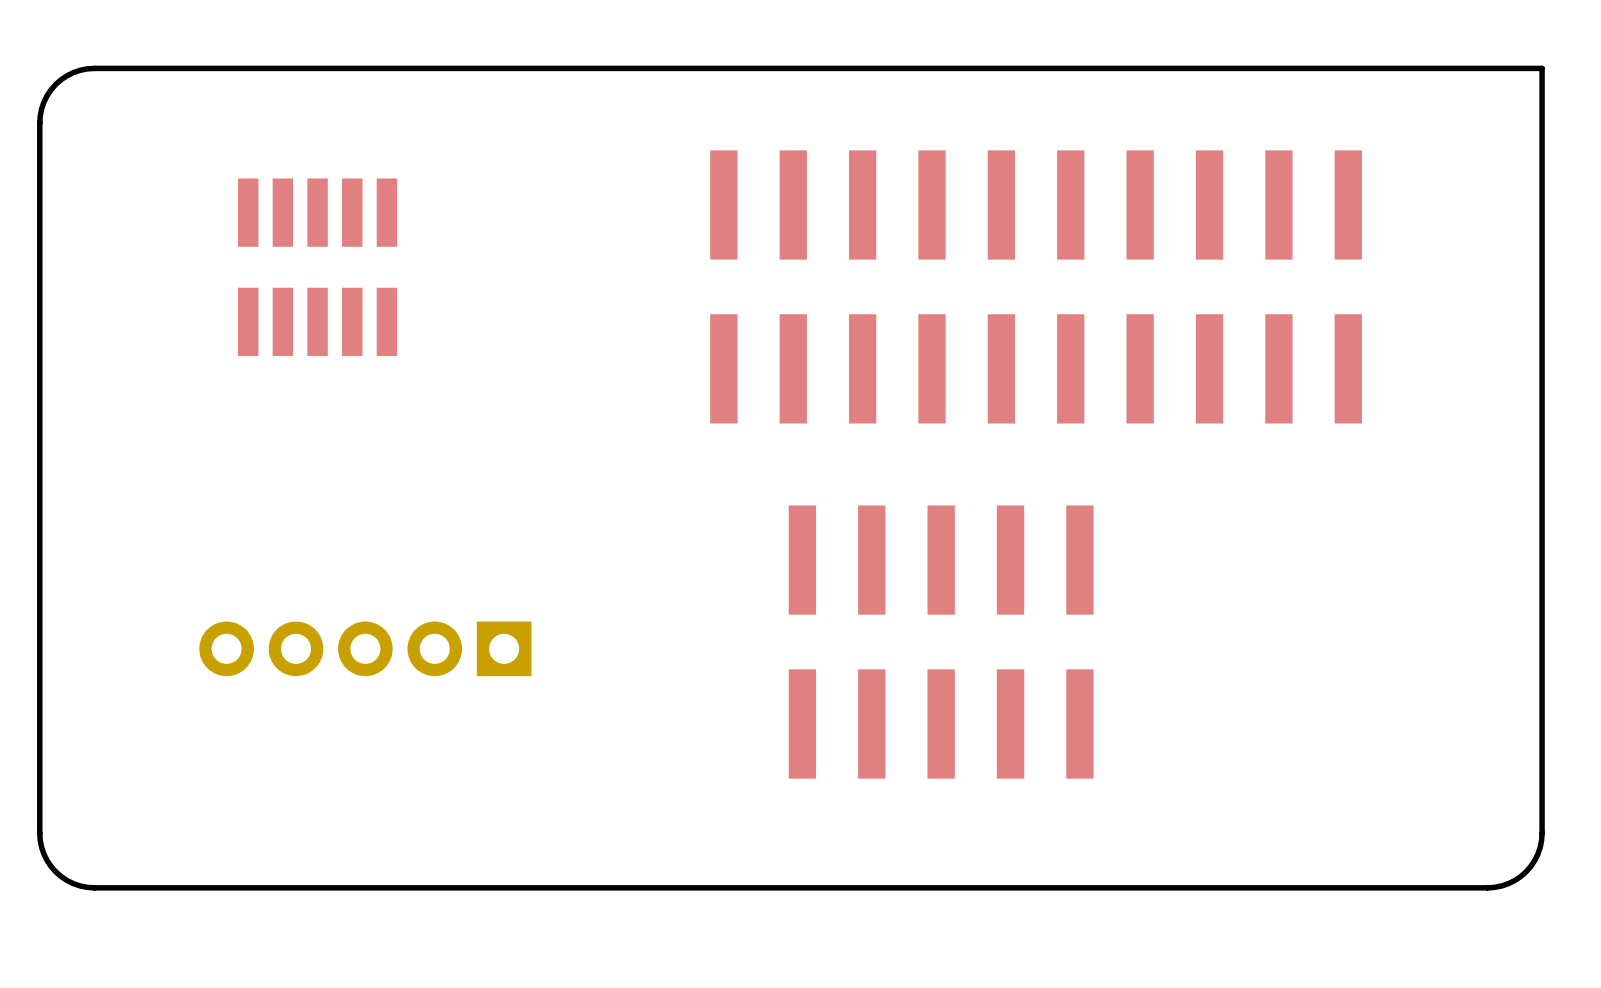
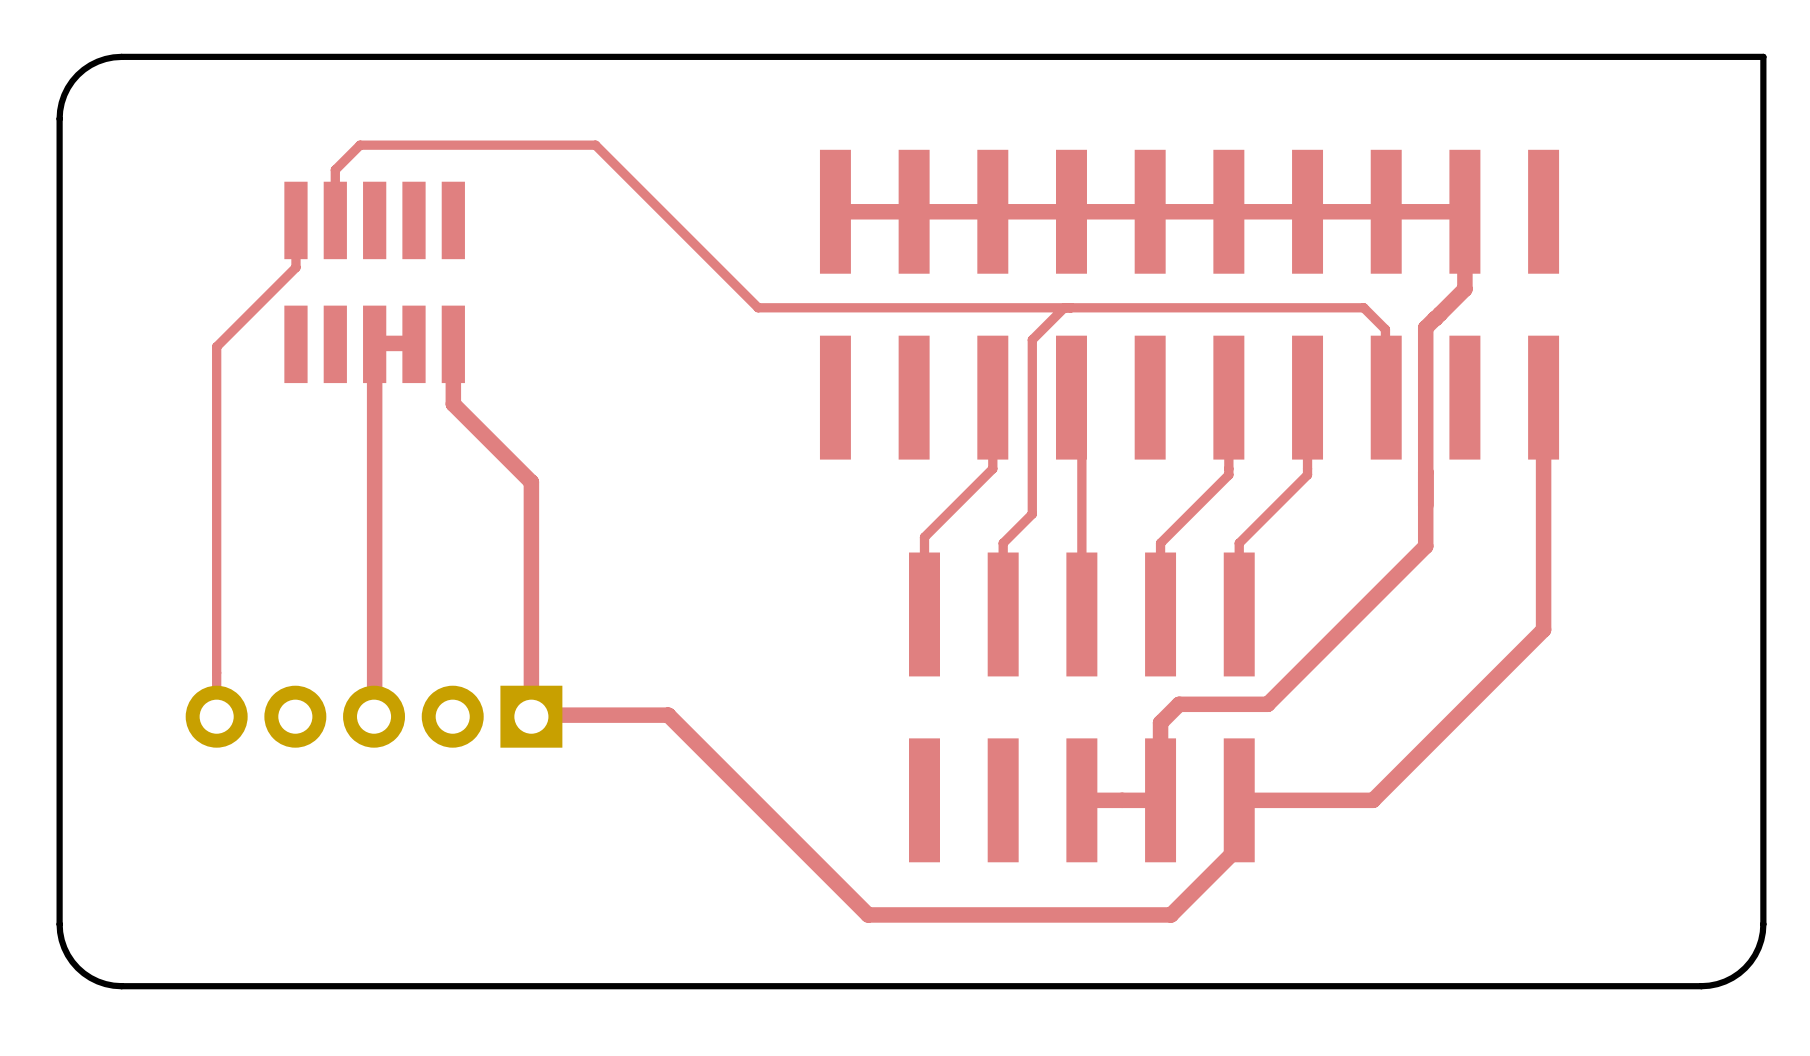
top track: none -> (835, 211) (1464, 211) (1464, 289) (1435, 318)
top track: none -> (295, 219) (295, 267) (216, 346) (216, 716)
top track: none -> (335, 219) (335, 169) (360, 145) (595, 145) (758, 307) (1363, 307) (1385, 329) (1386, 397)
top track: none -> (1064, 307) (1032, 339) (1032, 514) (1003, 543) (1003, 614)
top track: none -> (1435, 318) (1425, 327) (1425, 546) (1267, 704) (1179, 704) (1160, 722) (1160, 800) (1081, 800)
top track: none -> (413, 343) (374, 343) (374, 716)
top track: none -> (453, 343) (453, 404) (531, 482) (531, 716)
top track: none -> (992, 397) (992, 468) (924, 537) (924, 614)
top track: none -> (1071, 397) (1081, 408) (1081, 614)
top track: none -> (1228, 397) (1228, 474) (1160, 543) (1160, 614)
top track: none -> (1307, 397) (1307, 474) (1239, 543) (1239, 614)
top track: none -> (1543, 397) (1543, 629) (1373, 800) (1239, 800) (1239, 846) (1171, 914) (868, 914) (668, 715) (532, 715)
part position: (365, 648) -> (374, 716)

